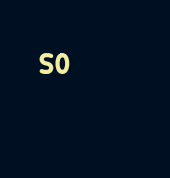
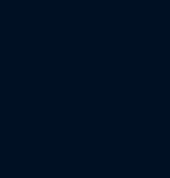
text: S0 (54, 63) -> none

